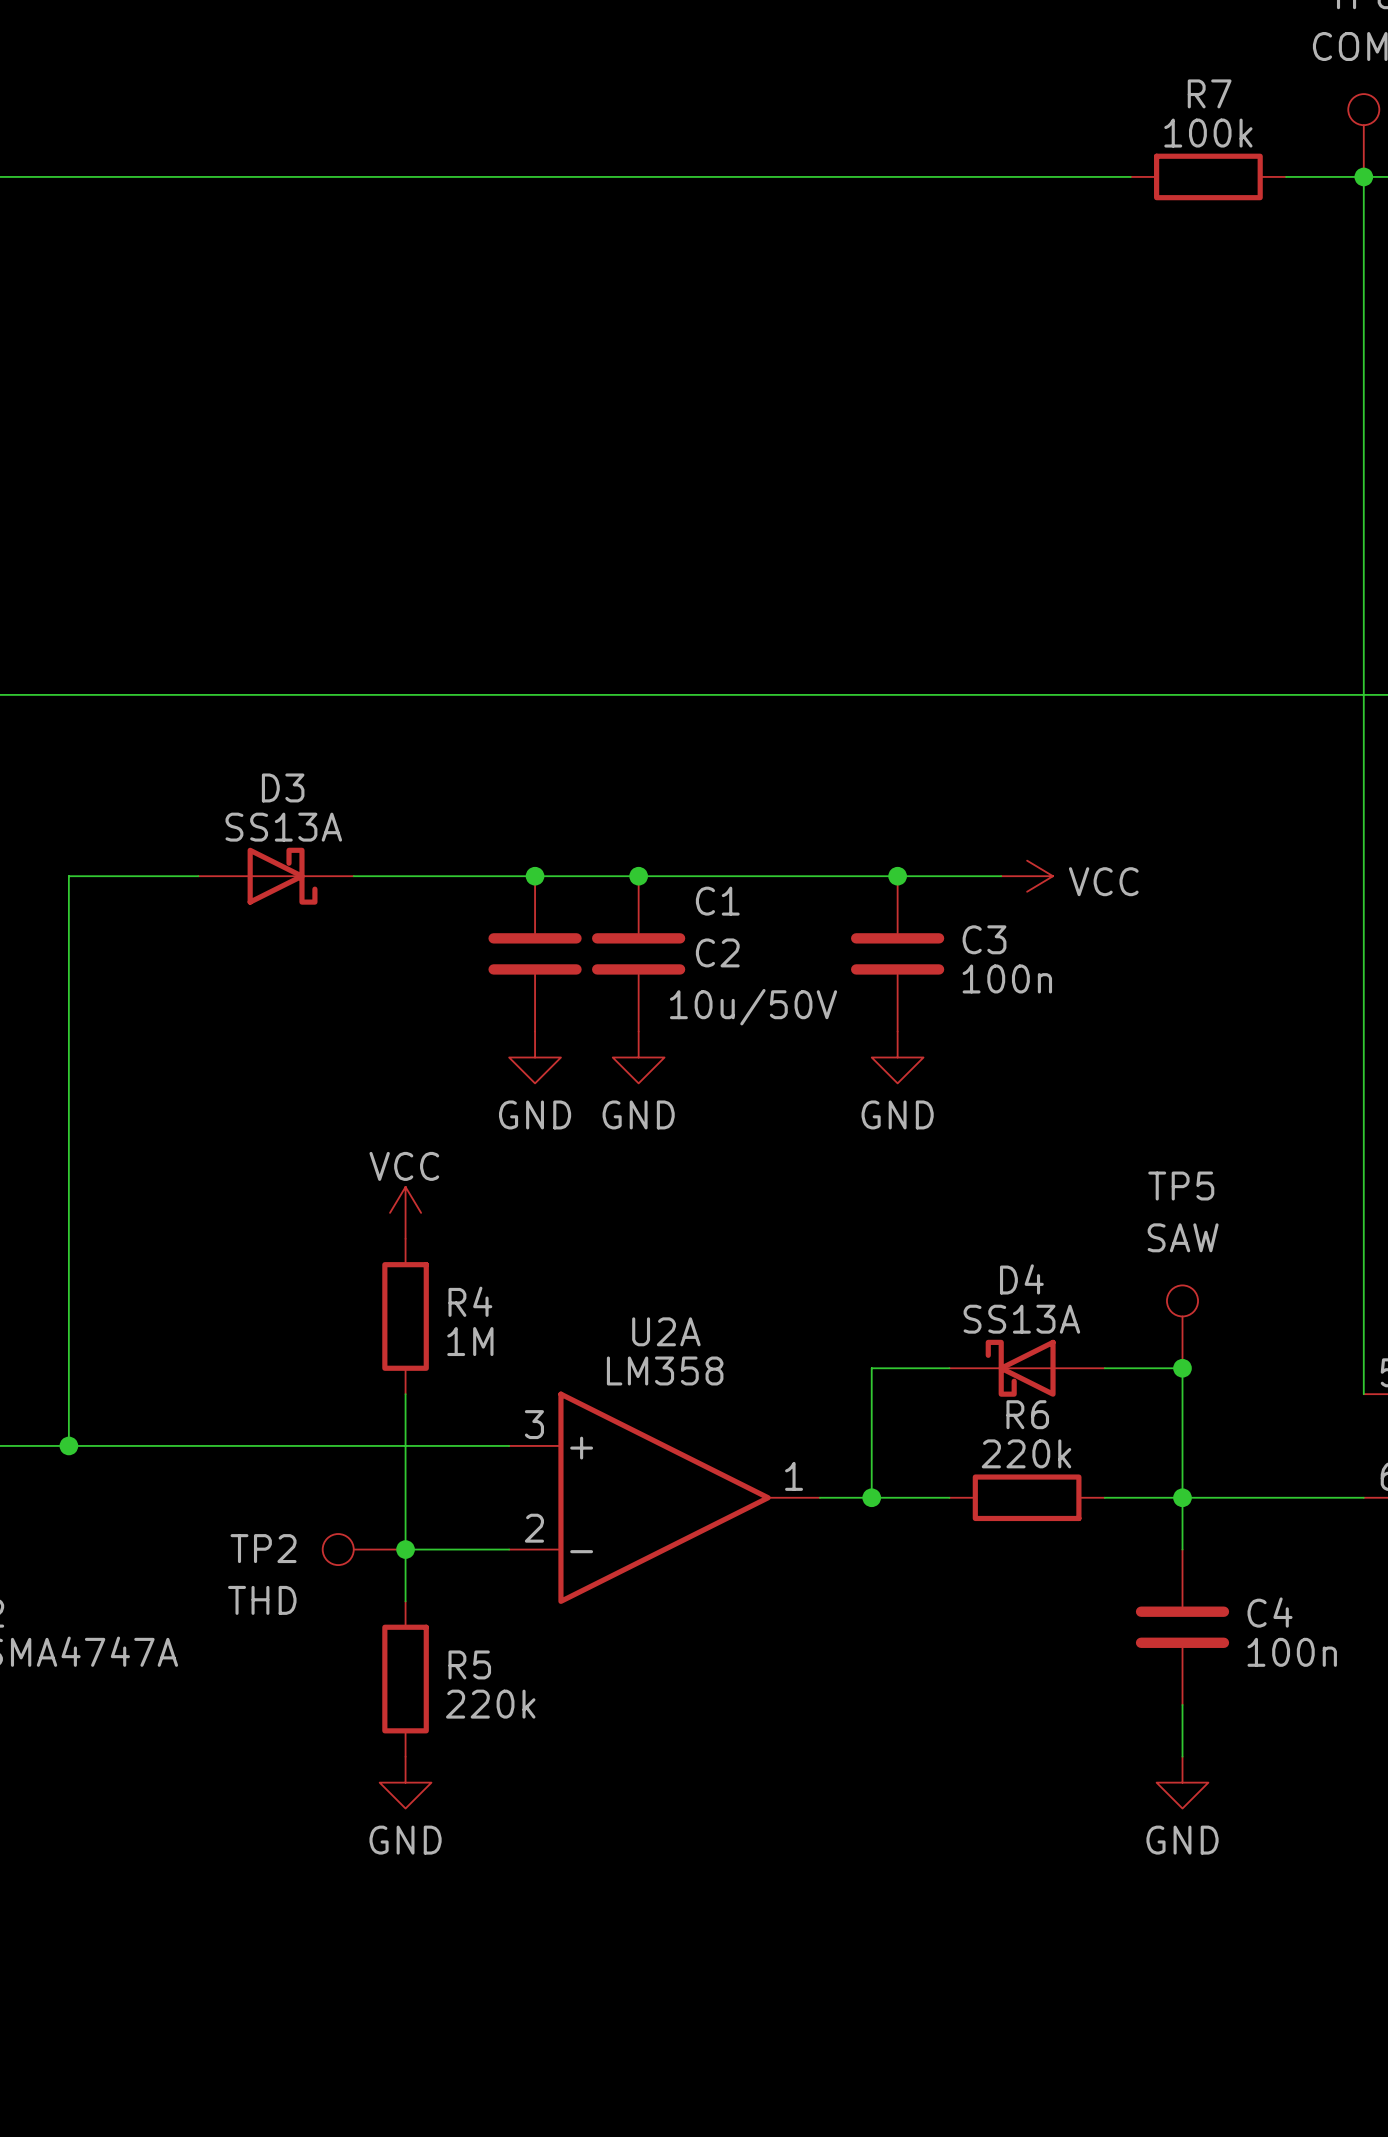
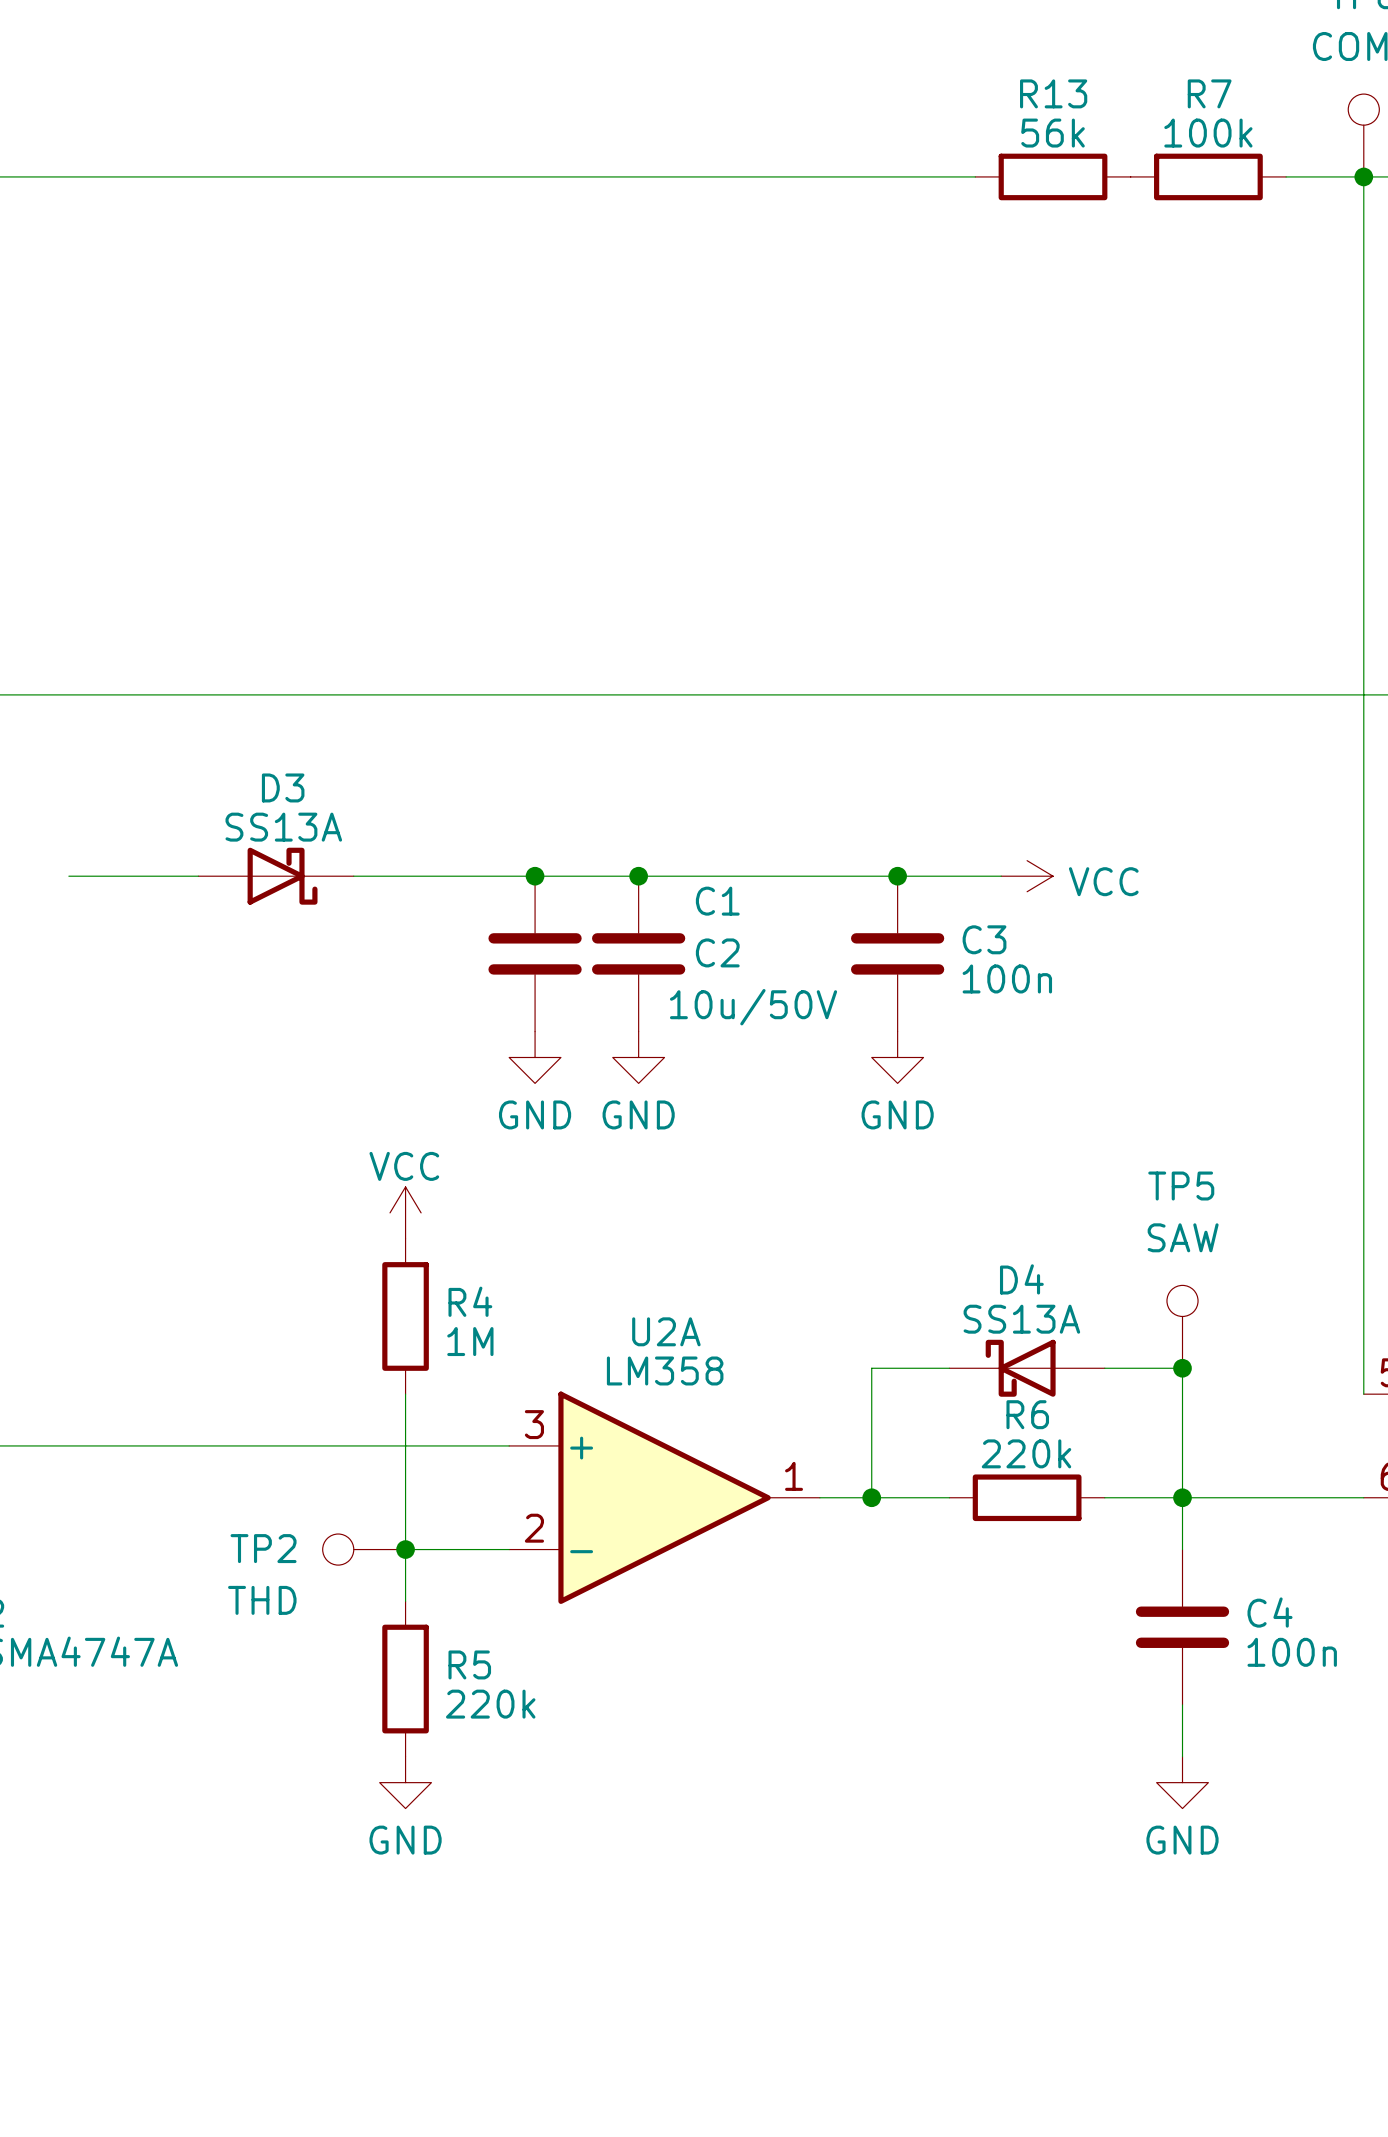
wire: (975, 176) (1130, 176) -> none
R13: none -> 56k (1053, 176)
wire: (68, 876) (68, 1445) -> none
junction: (68, 1445) -> none

